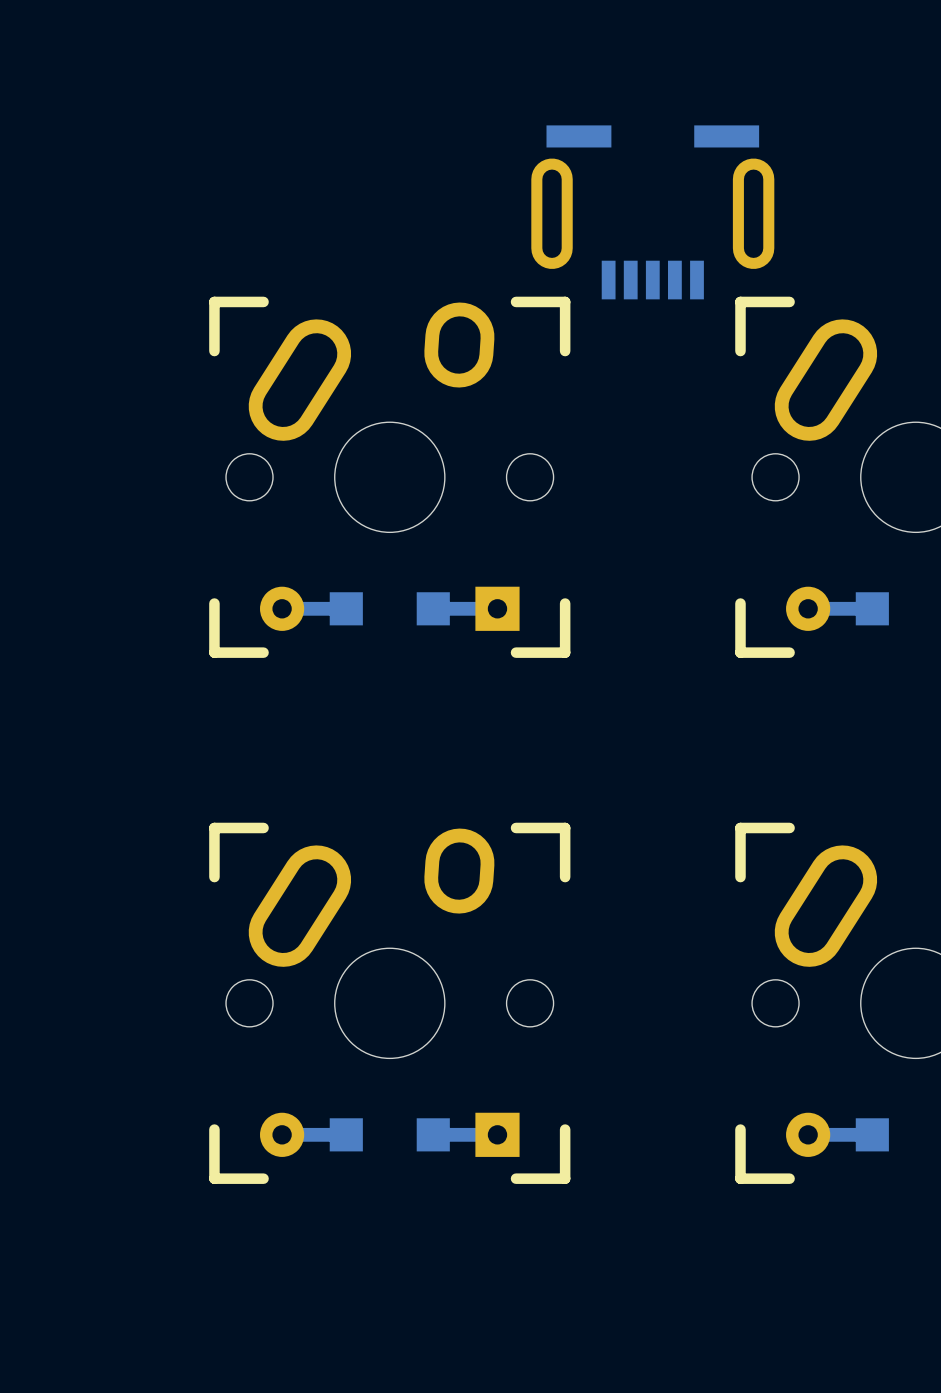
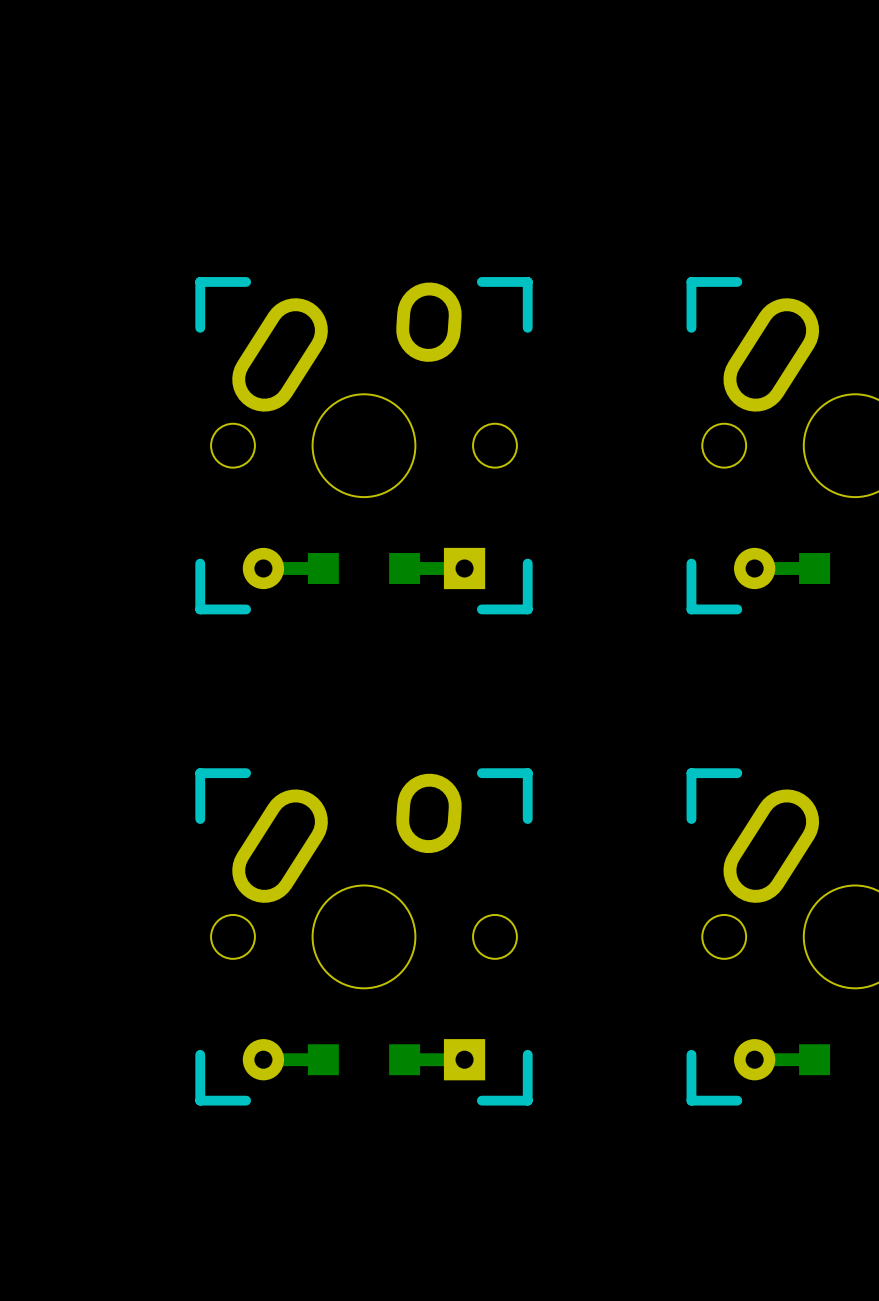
part: (652, 212) -> none

